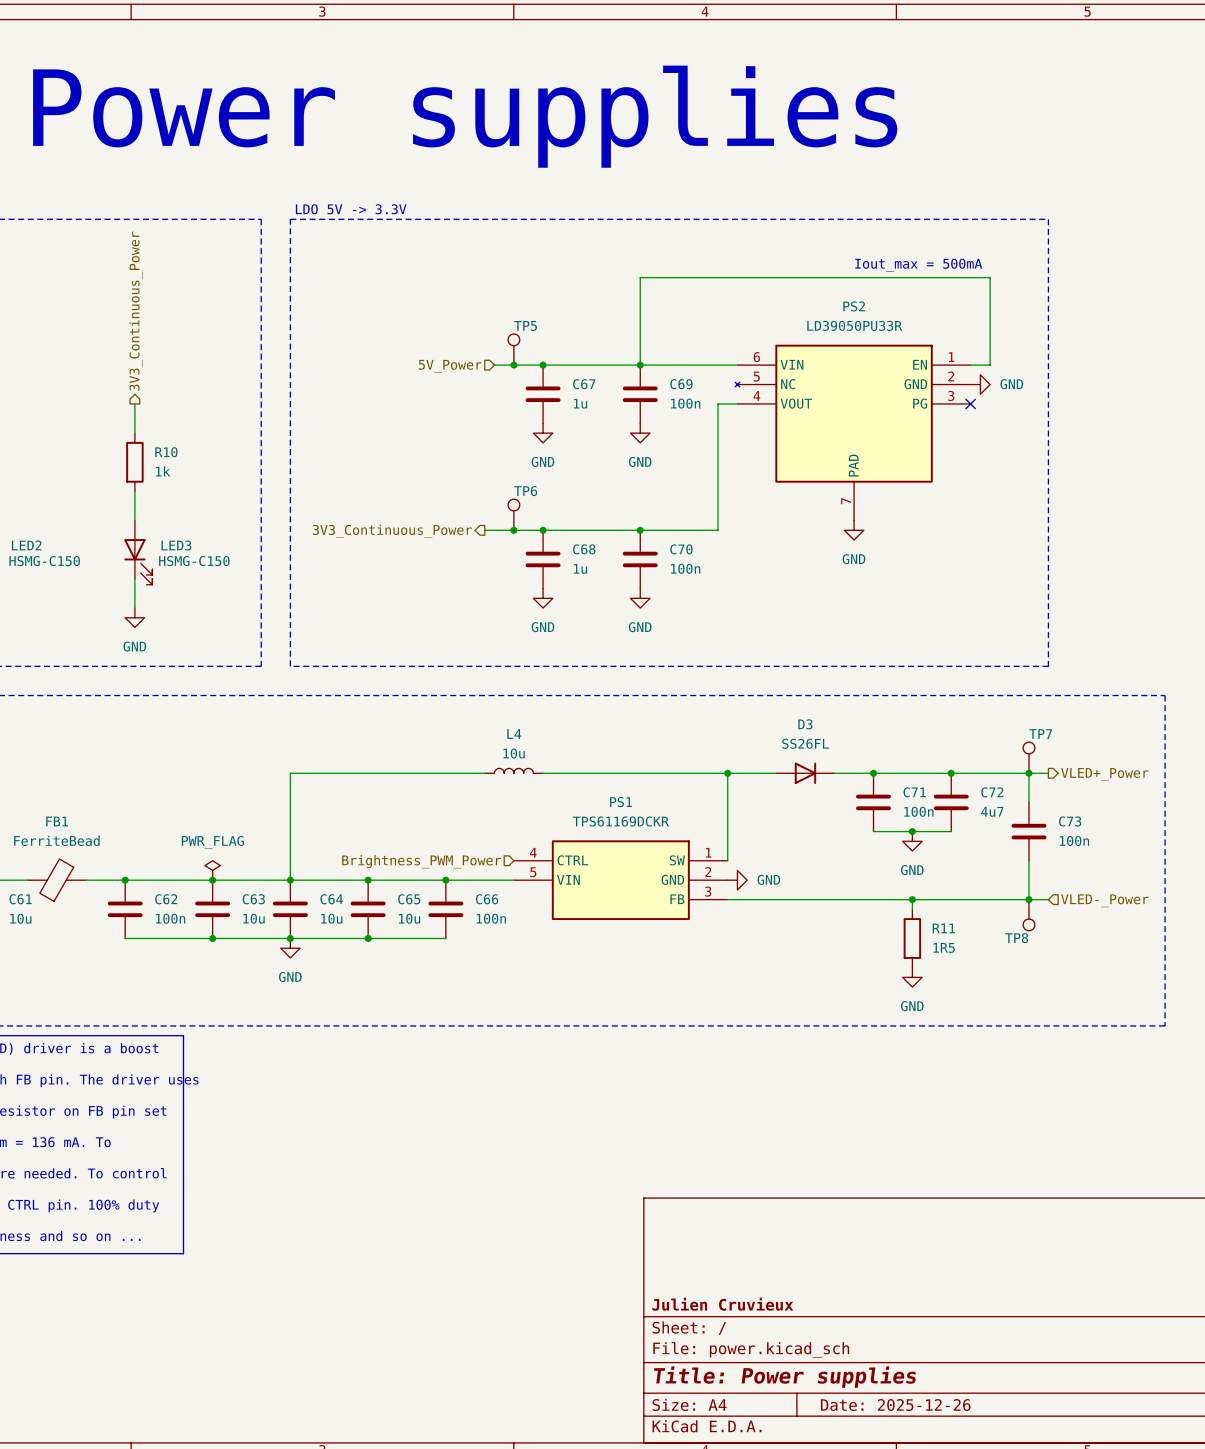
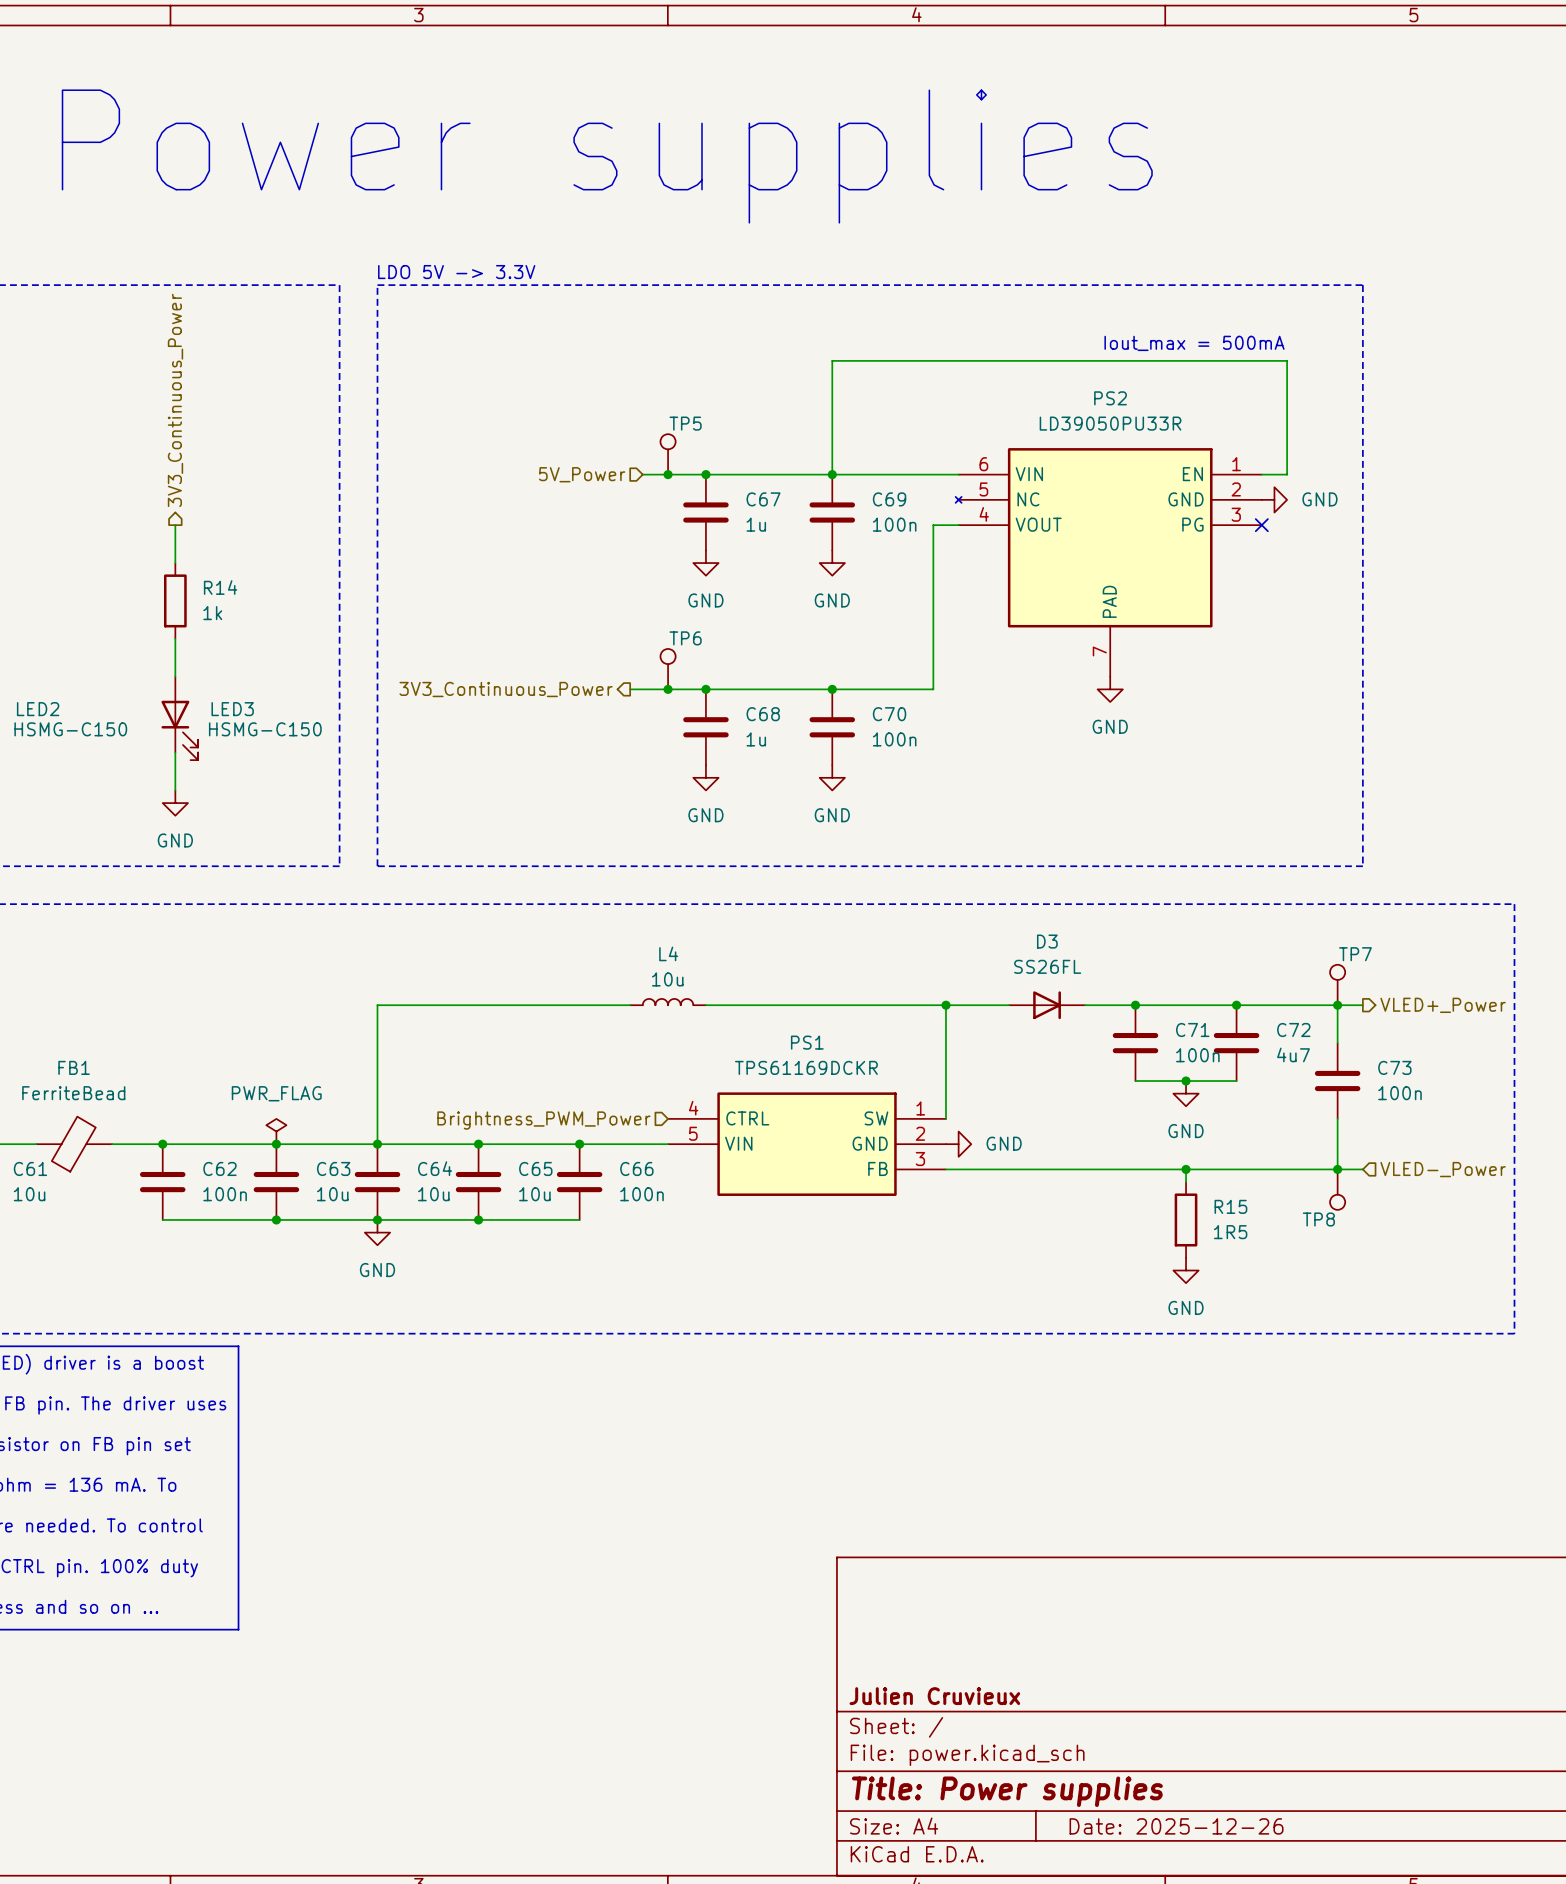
R10 name: R10 (166, 452) -> R14 (220, 587)
R11 name: R11 (943, 928) -> R15 (1230, 1206)

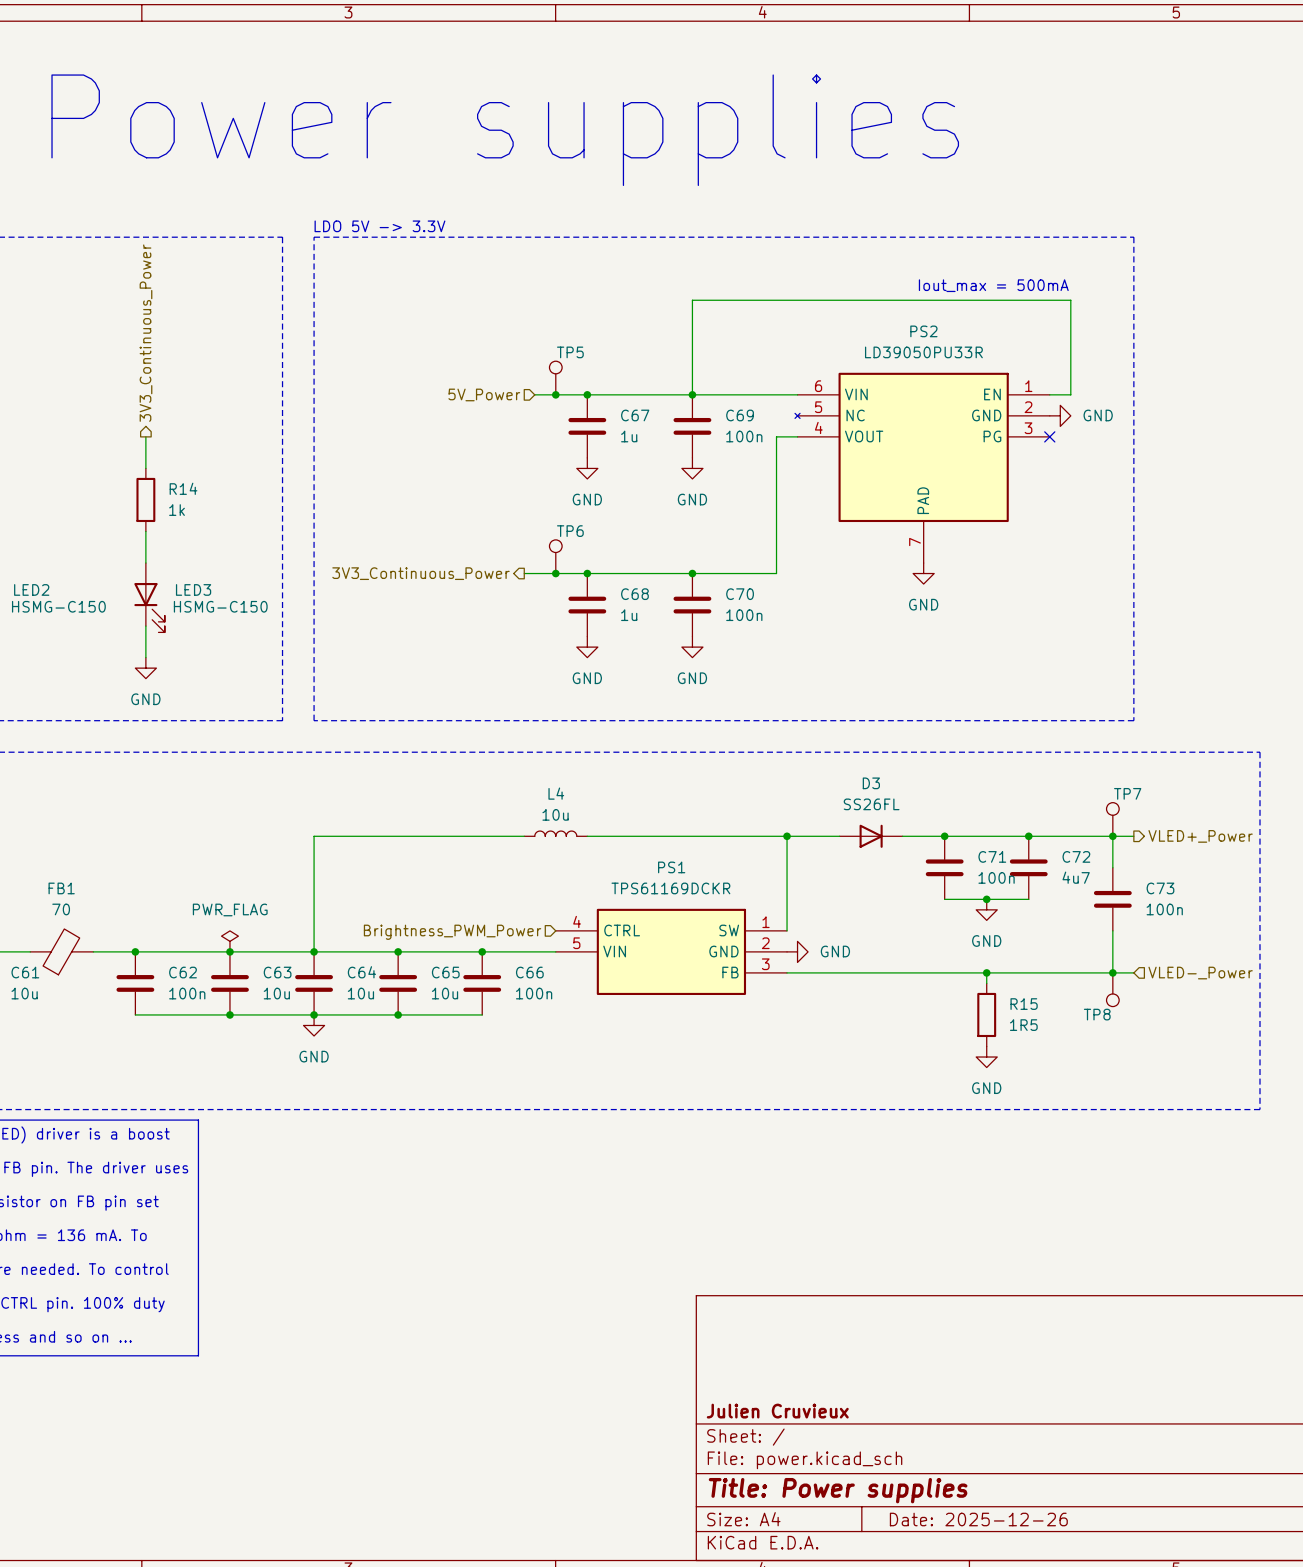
FB1 value: FerriteBead (73, 1093) -> 70 (61, 909)

